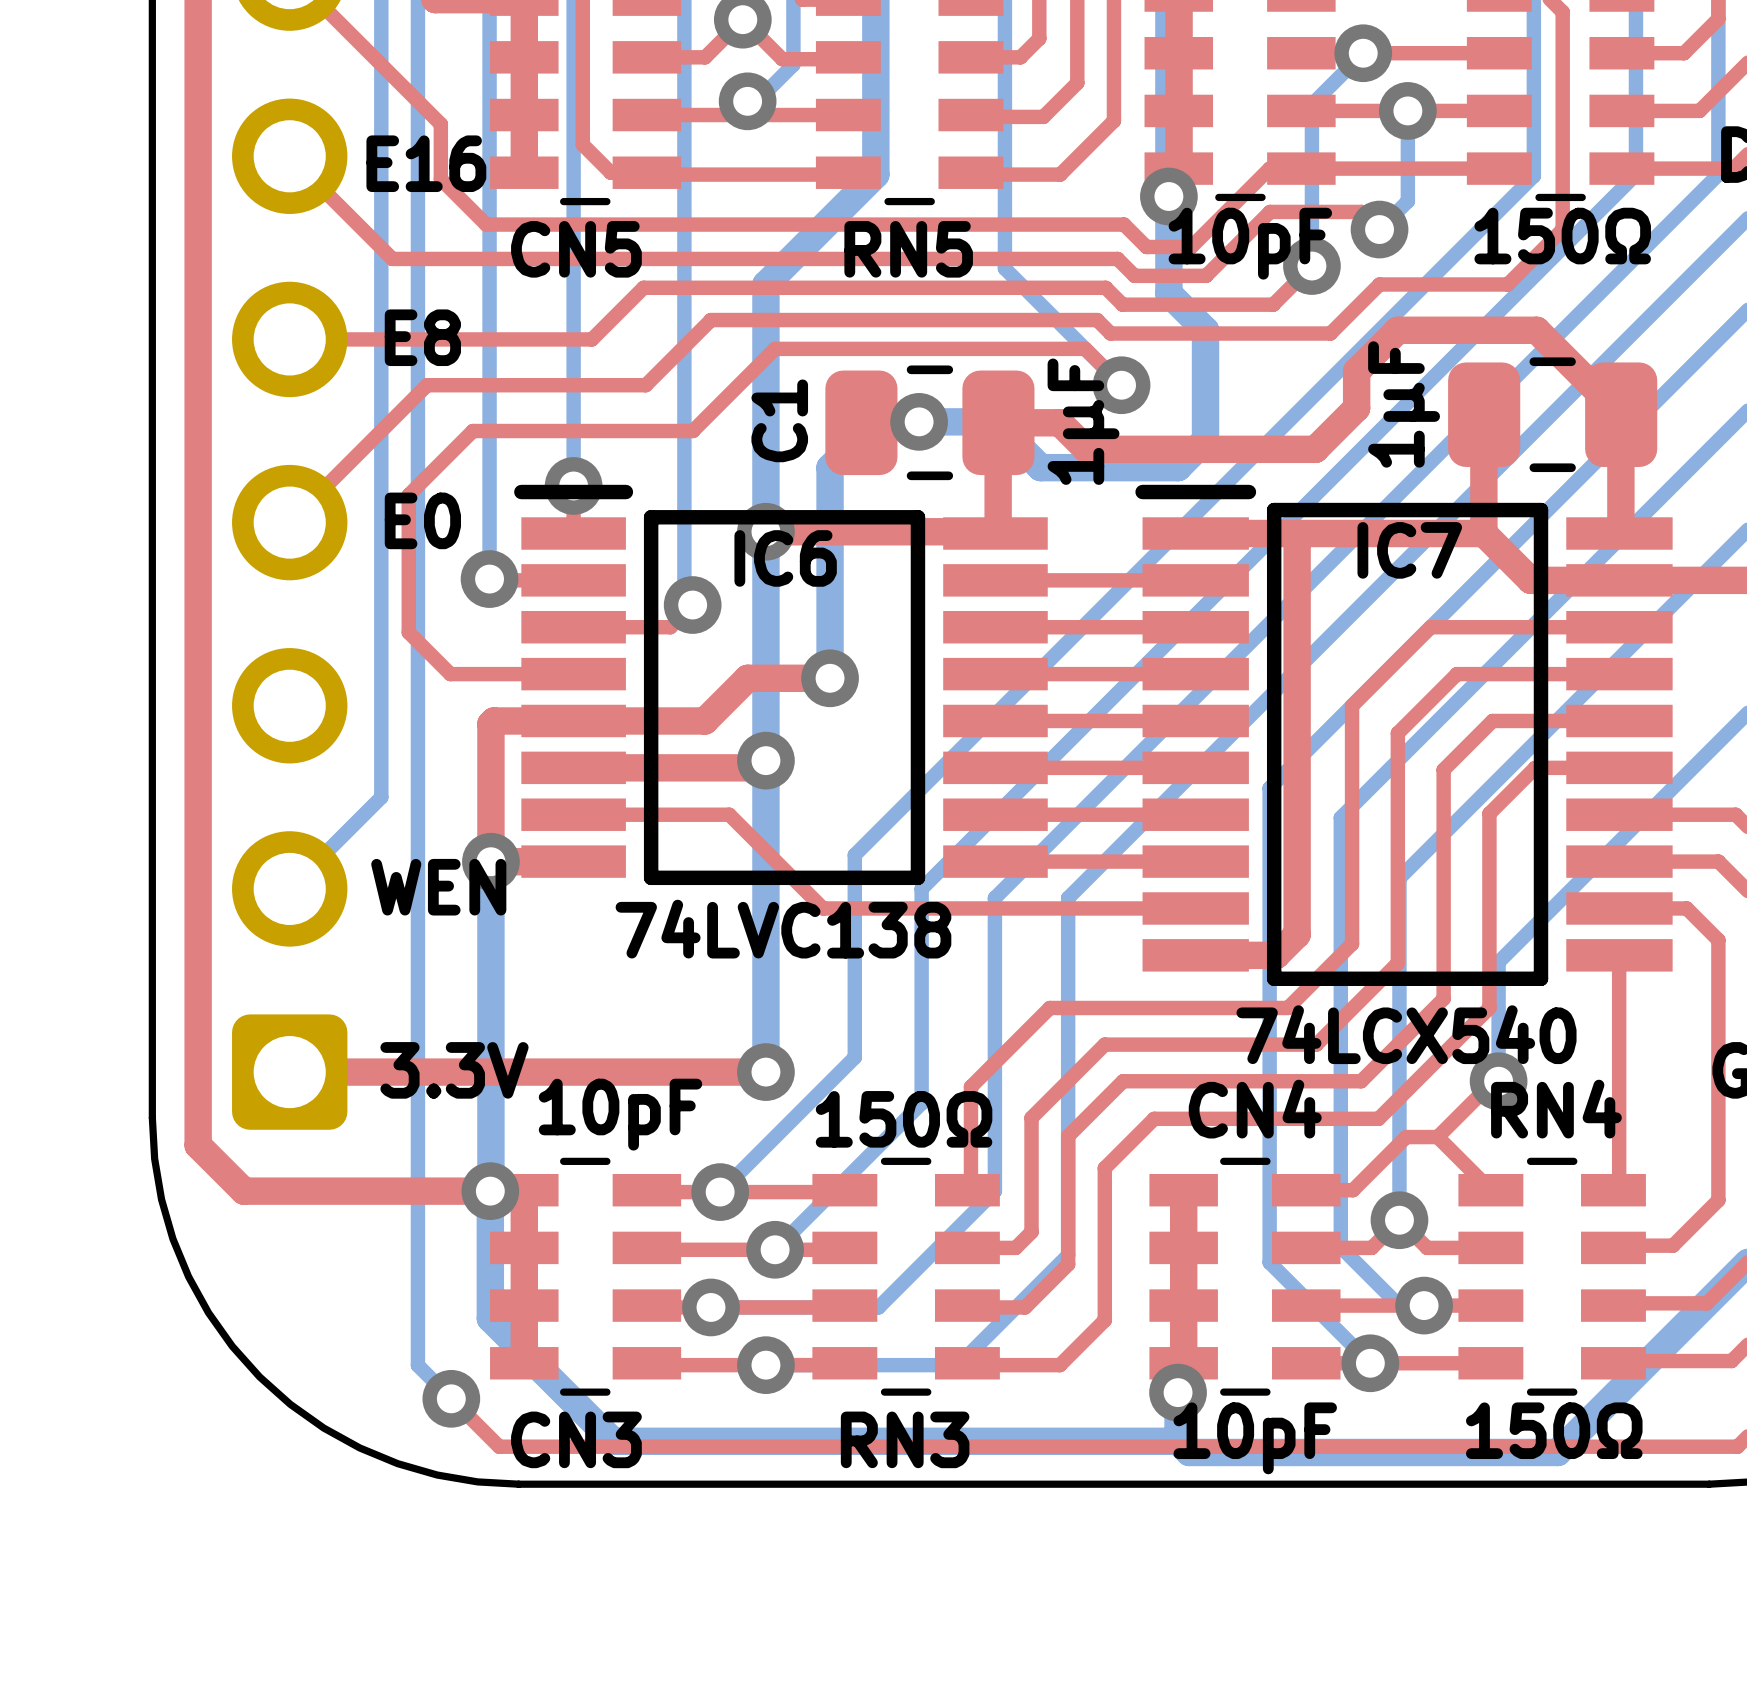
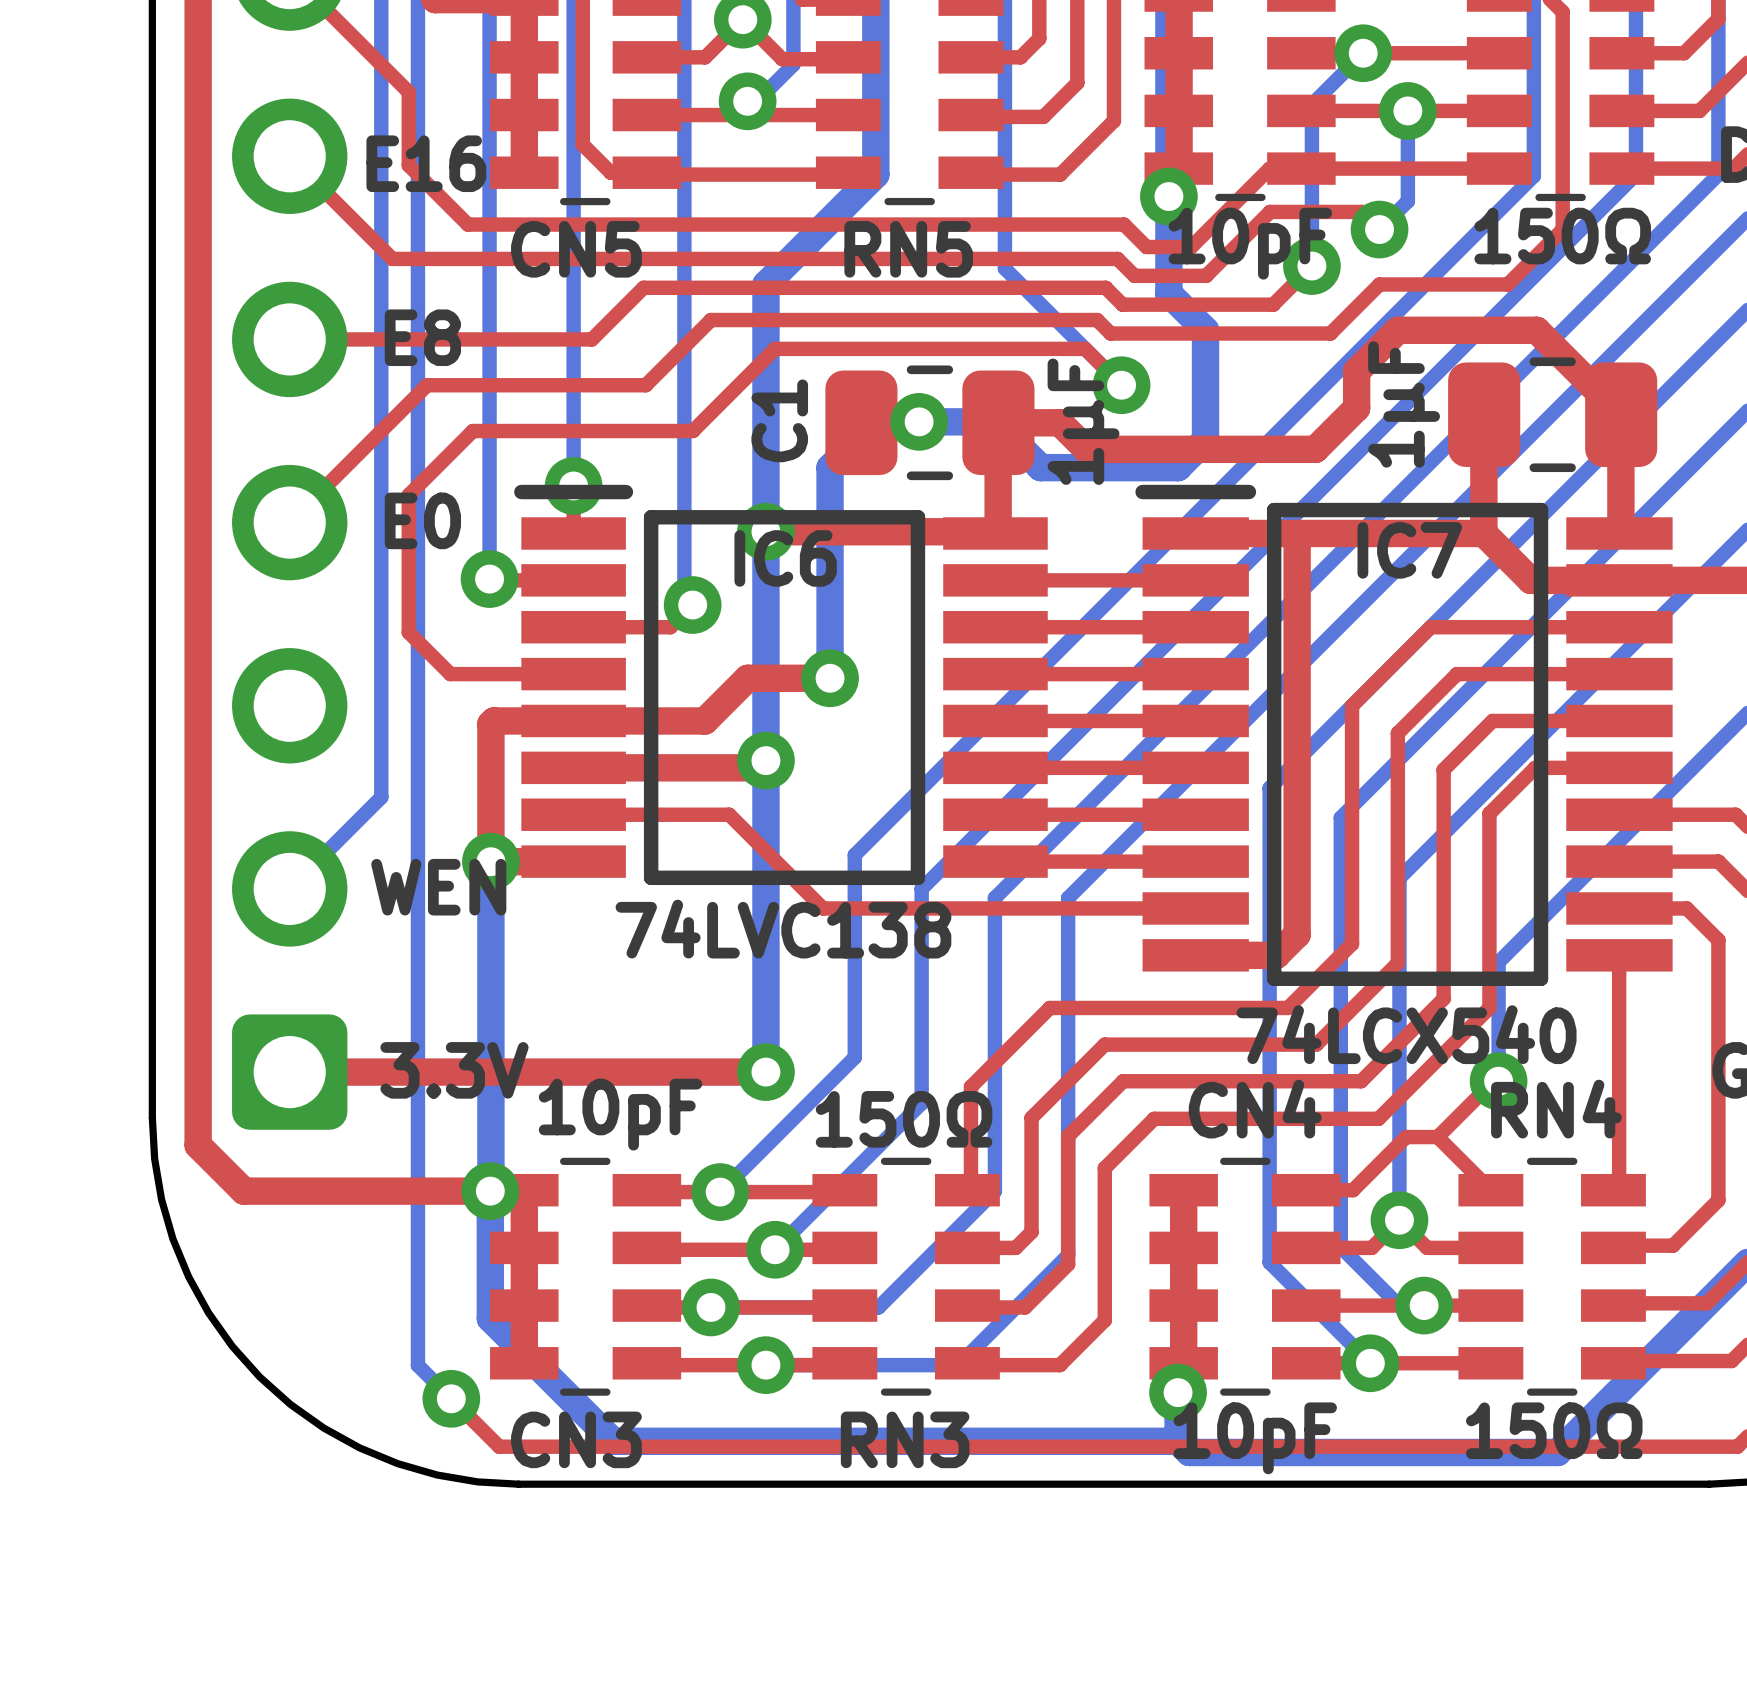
top track: (408, 92) (440, 124) (440, 179) (486, 224) -> (408, 92) (408, 165) (467, 224) (486, 224)

